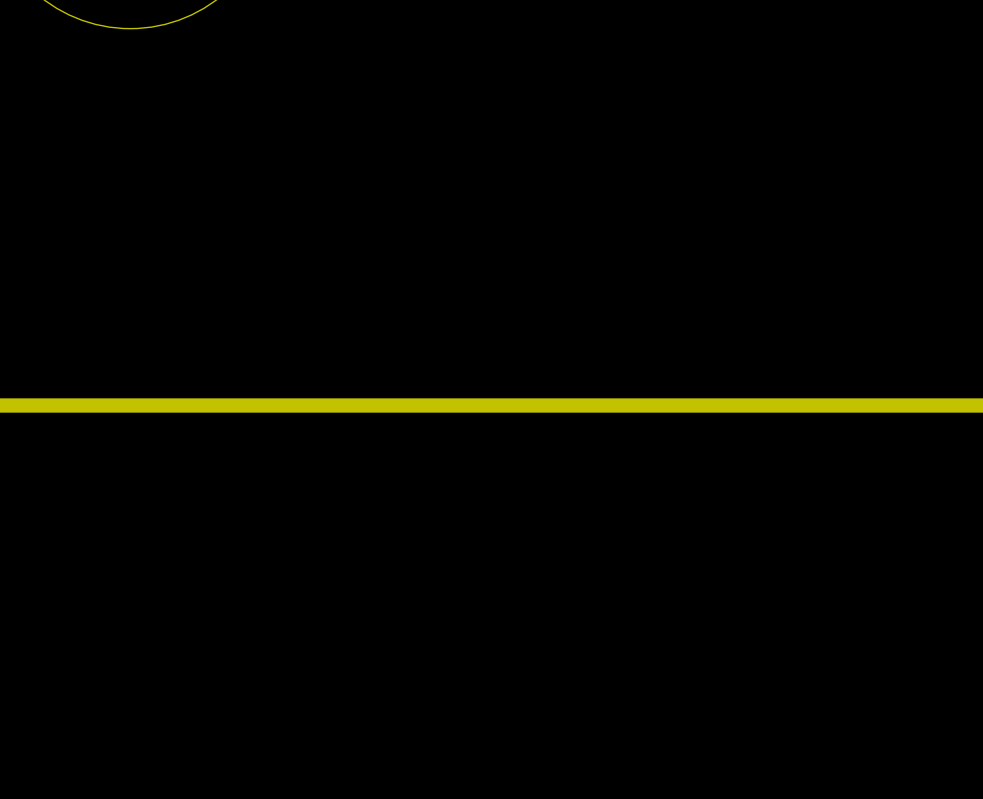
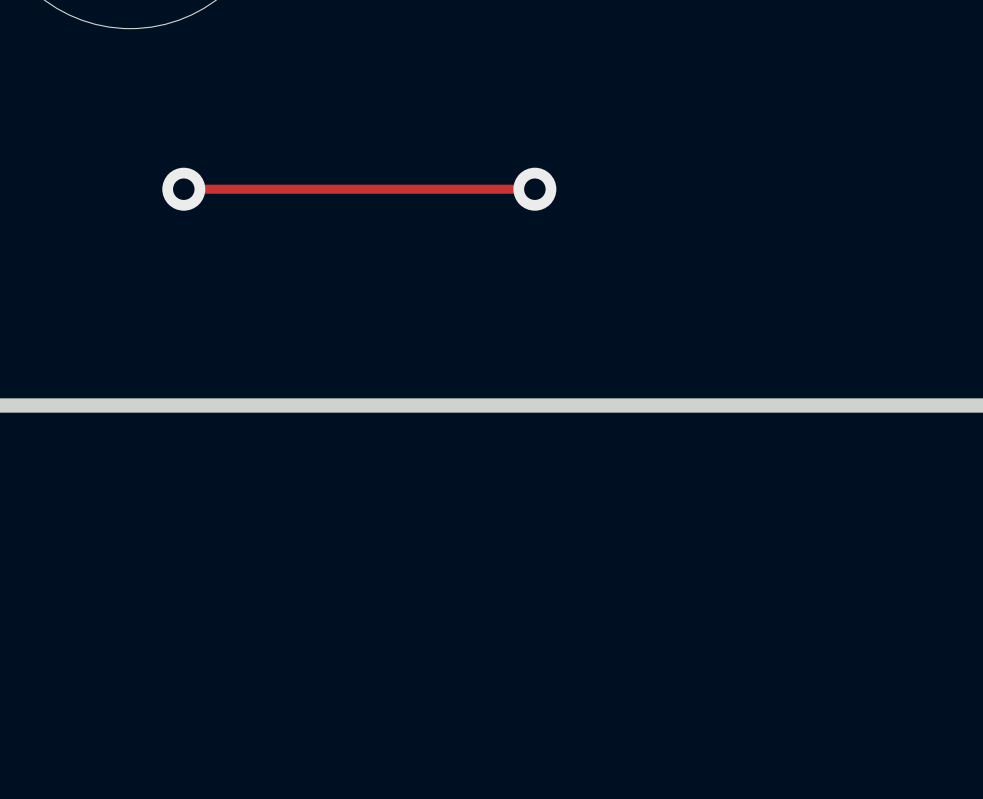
track: none -> (183, 189) (534, 189)
via: none -> (183, 189)
via: none -> (534, 189)

